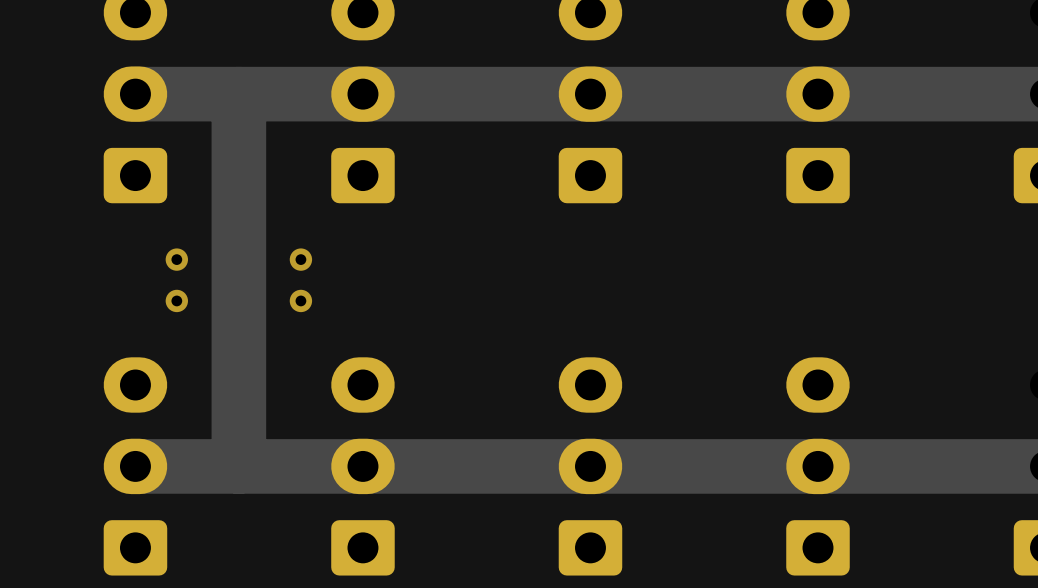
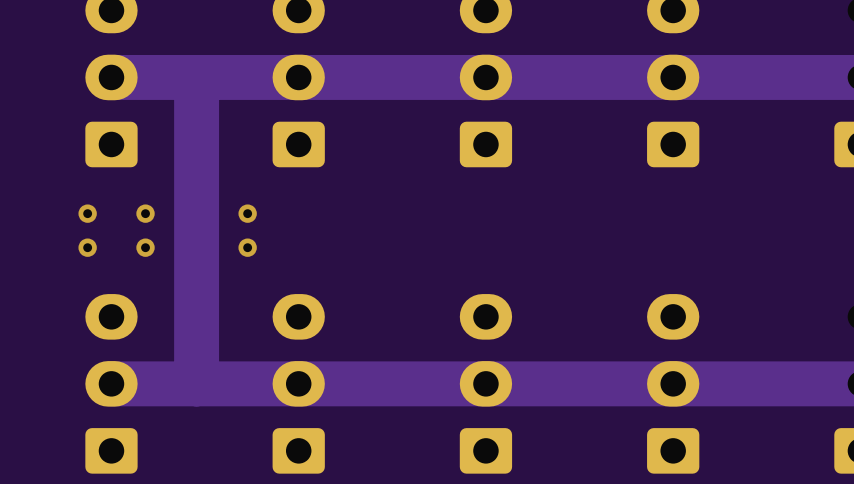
via: none -> (87, 213)
via: none -> (87, 247)

